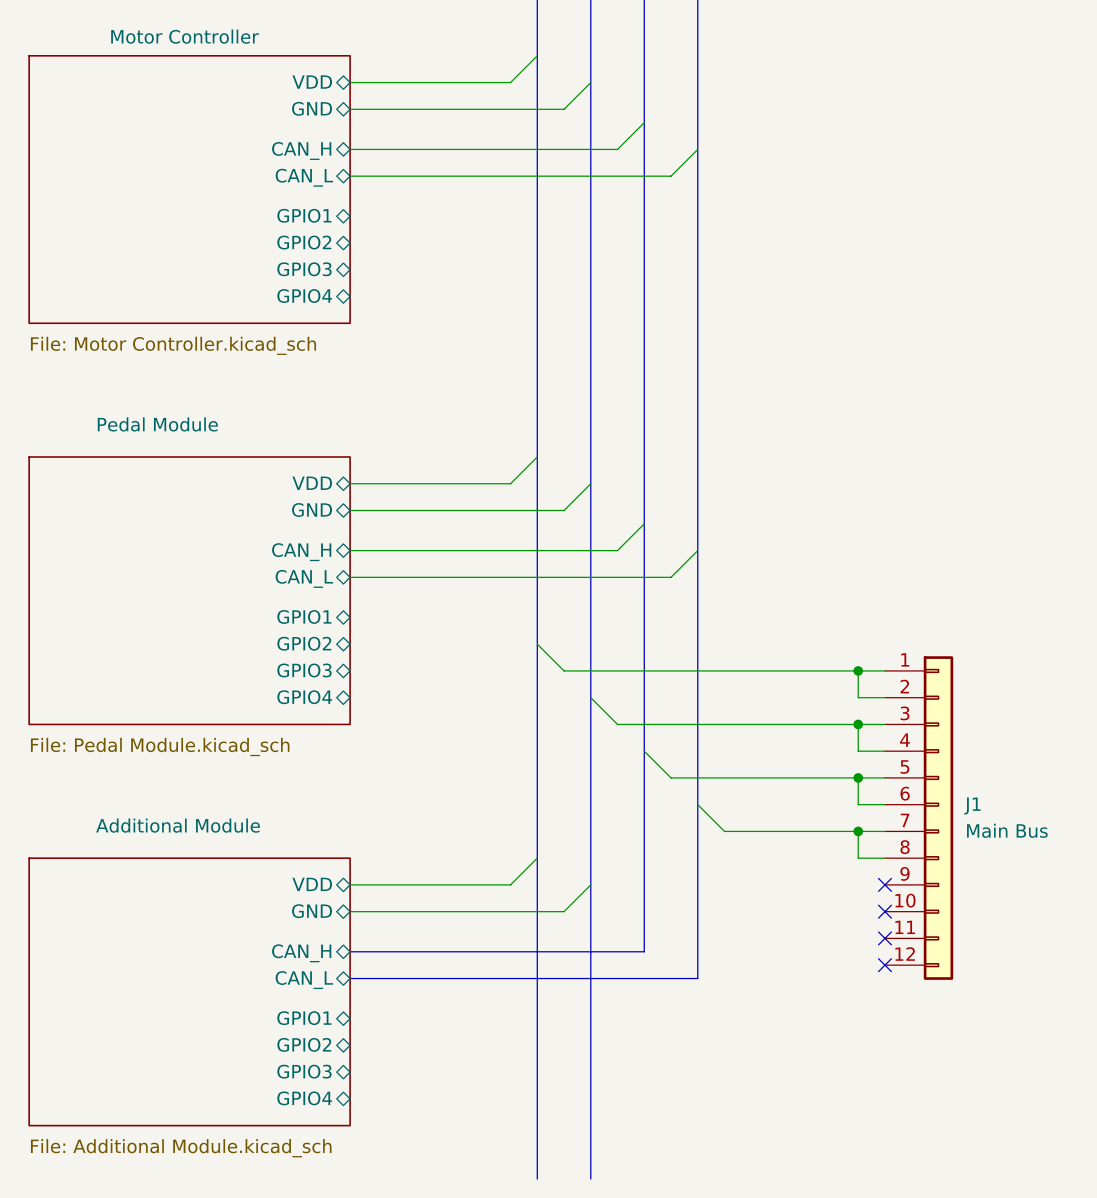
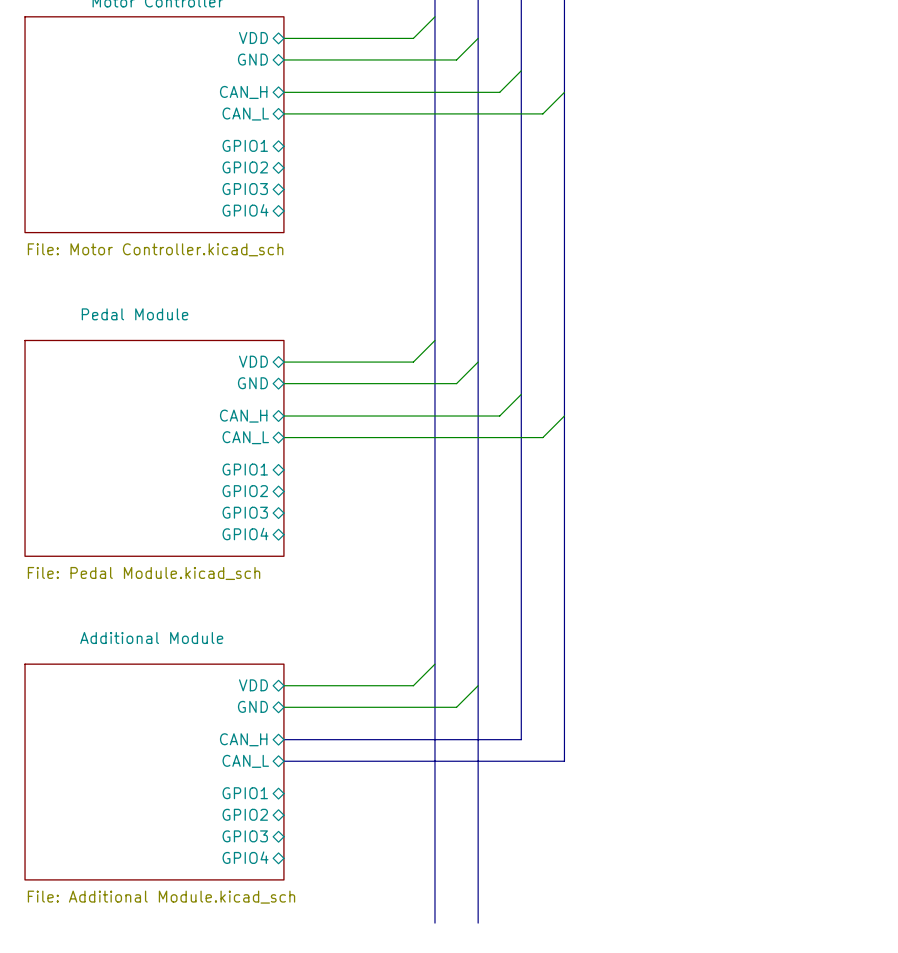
wire: (537, 644) (564, 670) (884, 670) -> none
wire: (858, 670) (858, 697) (884, 697) -> none
junction: (858, 670) -> none
wire: (590, 697) (617, 724) (884, 724) -> none
wire: (858, 724) (858, 751) (884, 751) -> none
junction: (858, 724) -> none
wire: (644, 751) (671, 777) (884, 777) -> none
wire: (858, 777) (858, 804) (884, 804) -> none
junction: (858, 777) -> none
wire: (697, 804) (724, 831) (884, 831) -> none
J1: Main Bus (919, 818) -> none
wire: (858, 831) (858, 858) (884, 858) -> none
junction: (858, 831) -> none
no-connect mark: (884, 884) -> none
no-connect mark: (884, 911) -> none
no-connect mark: (884, 938) -> none
no-connect mark: (884, 965) -> none

